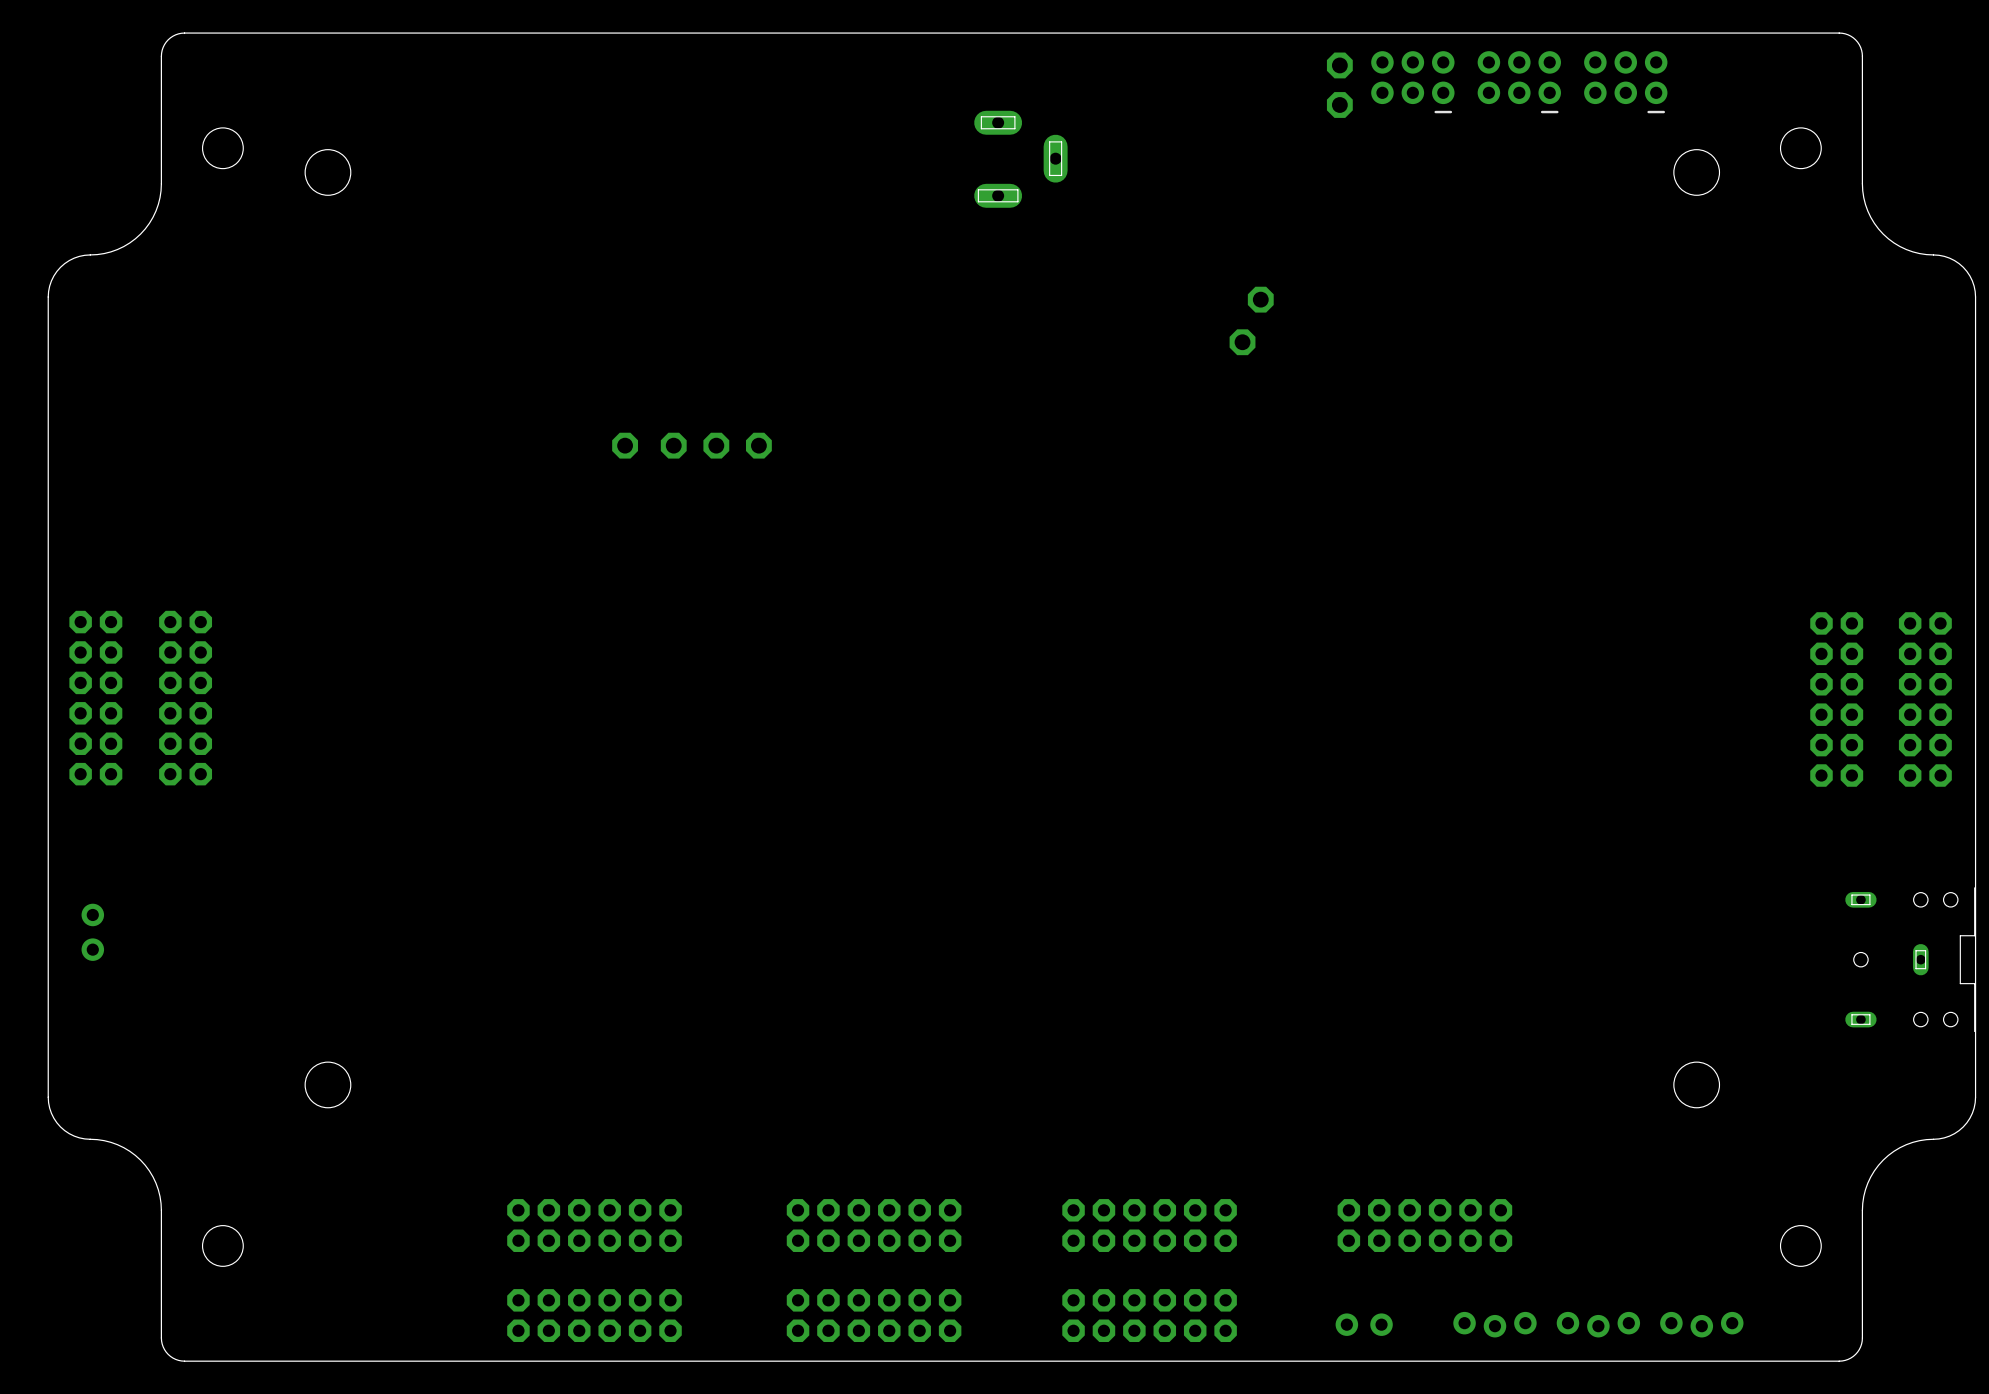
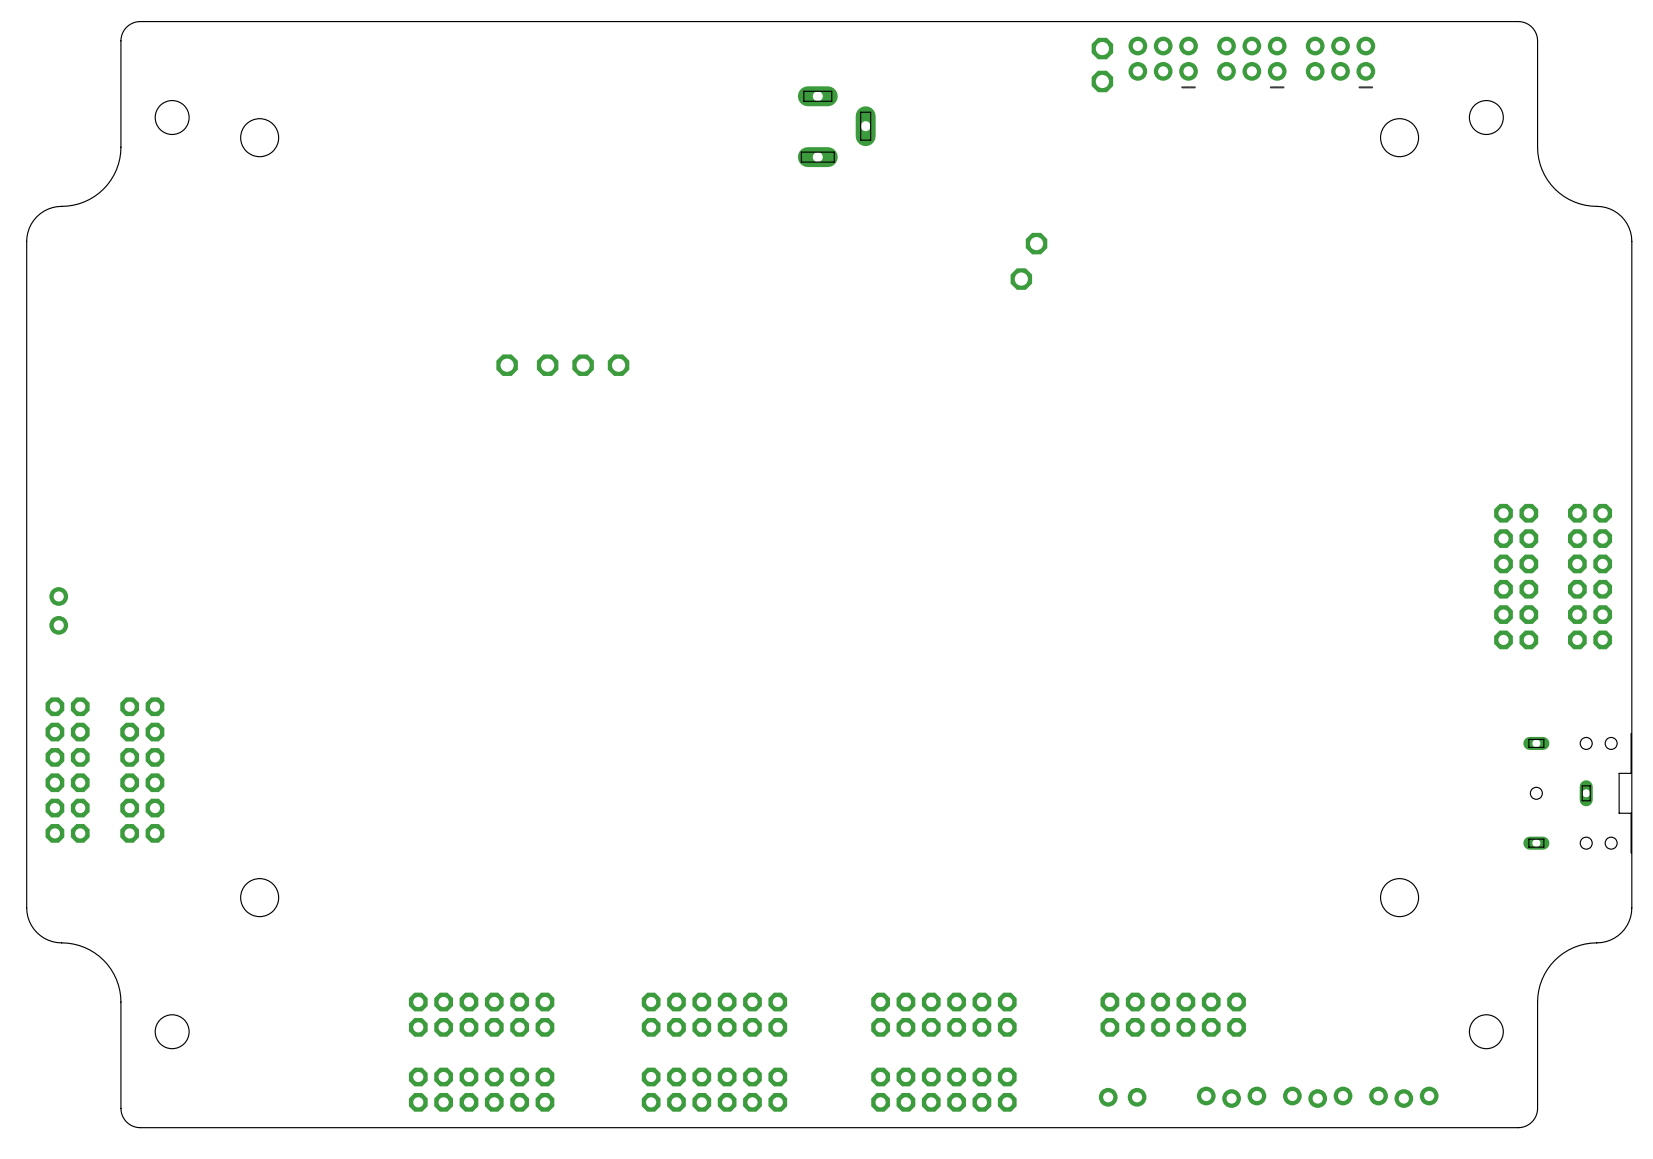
part: (95, 698) -> none
part: (185, 698) -> none
part: none -> (58, 610)
part footprint: [81, 903, 105, 961] -> [45, 697, 90, 843]
part: none -> (142, 770)

